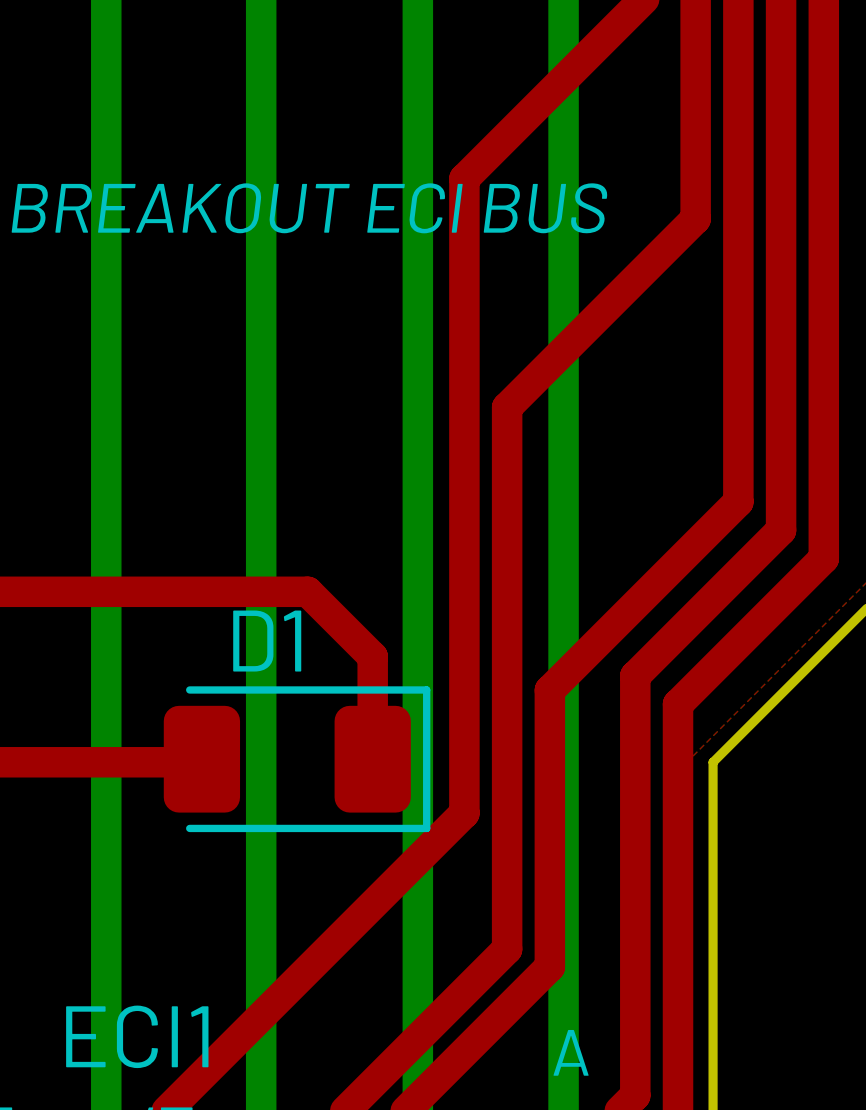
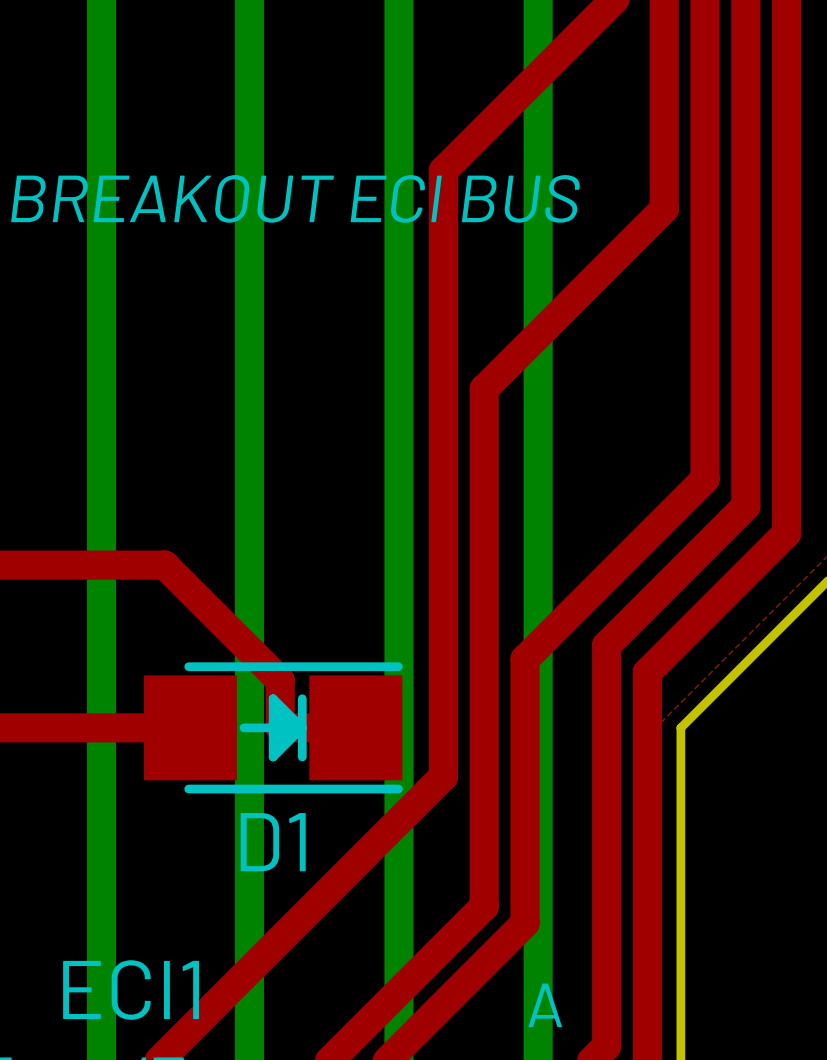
top track: (172, 591) (307, 591) (372, 656) (372, 759) -> (164, 565) (280, 680) (280, 727) (355, 727)
D1 name position: D1 (267, 641) -> D1 (273, 842)
D1 footprint: [163, 686, 431, 833] -> [143, 662, 403, 794]

